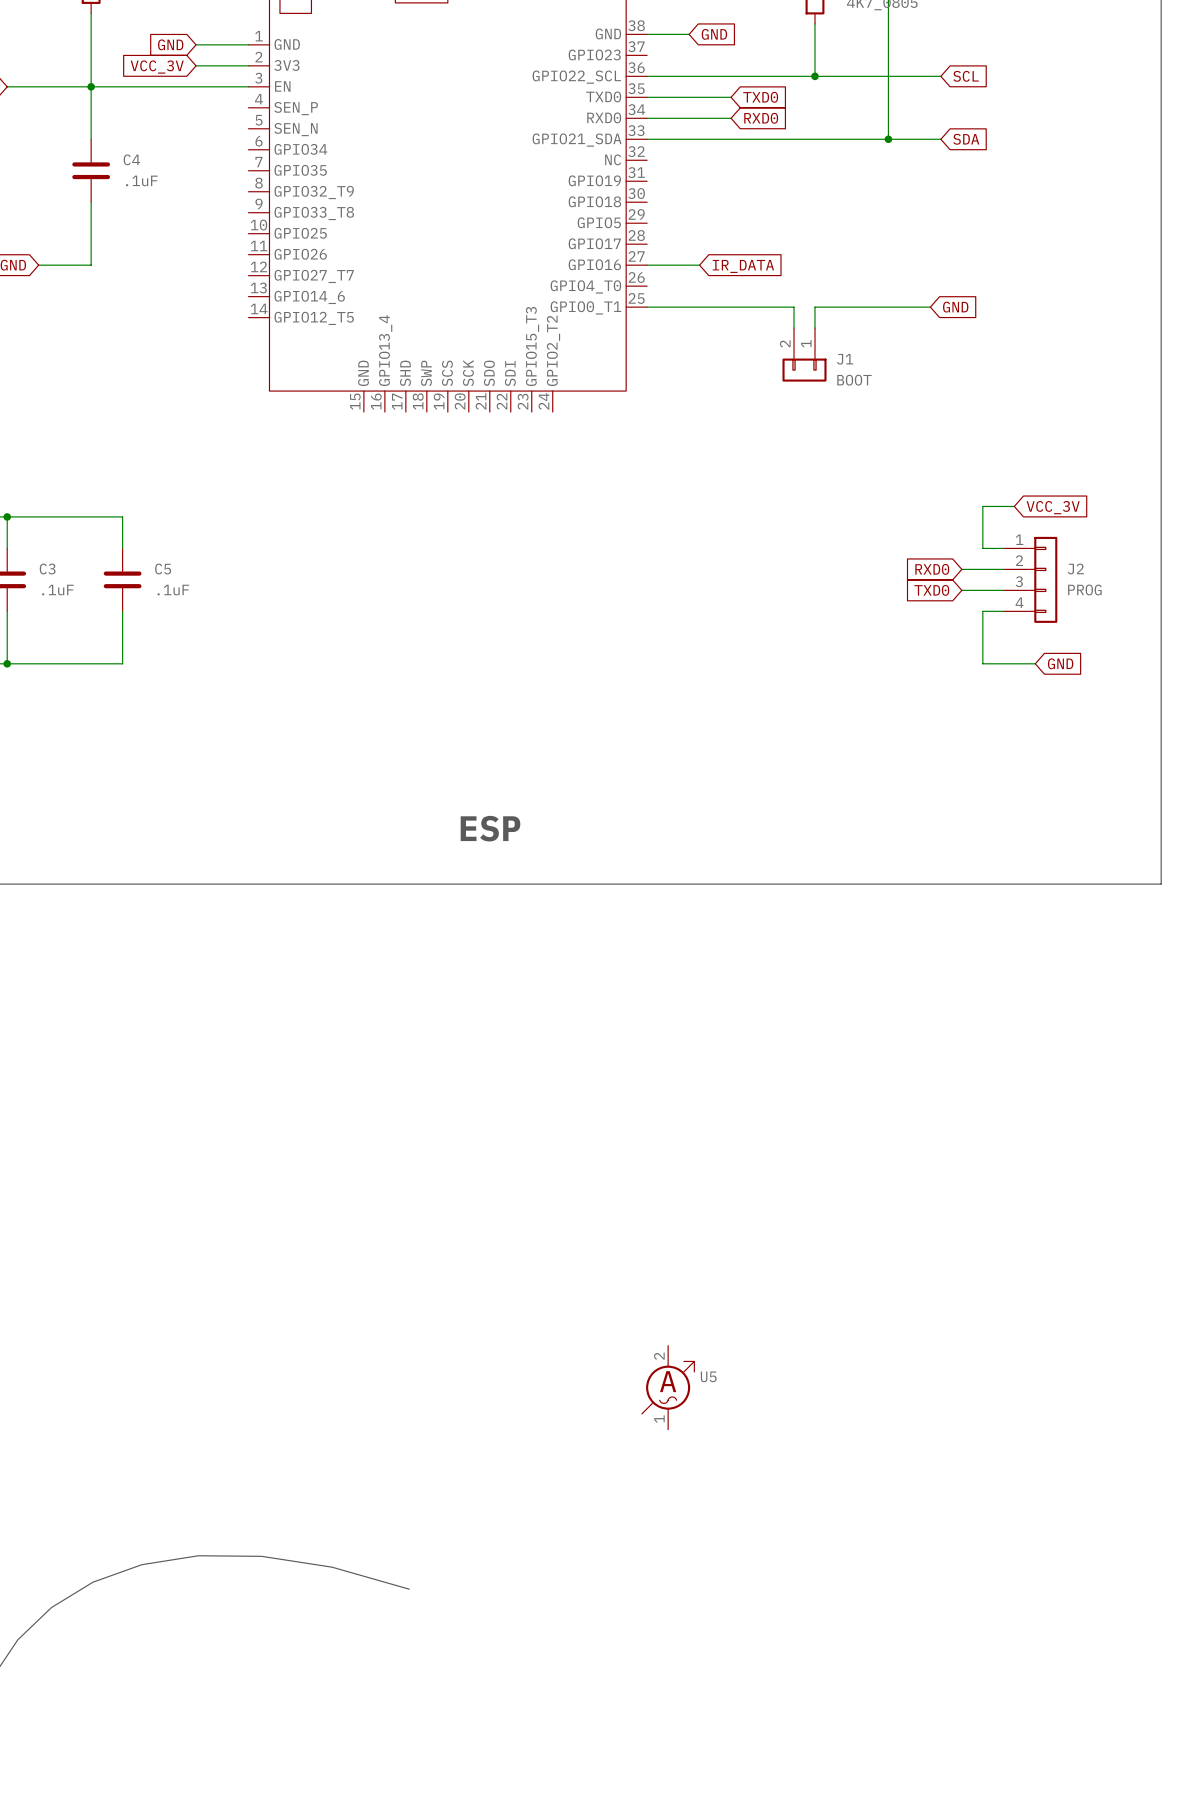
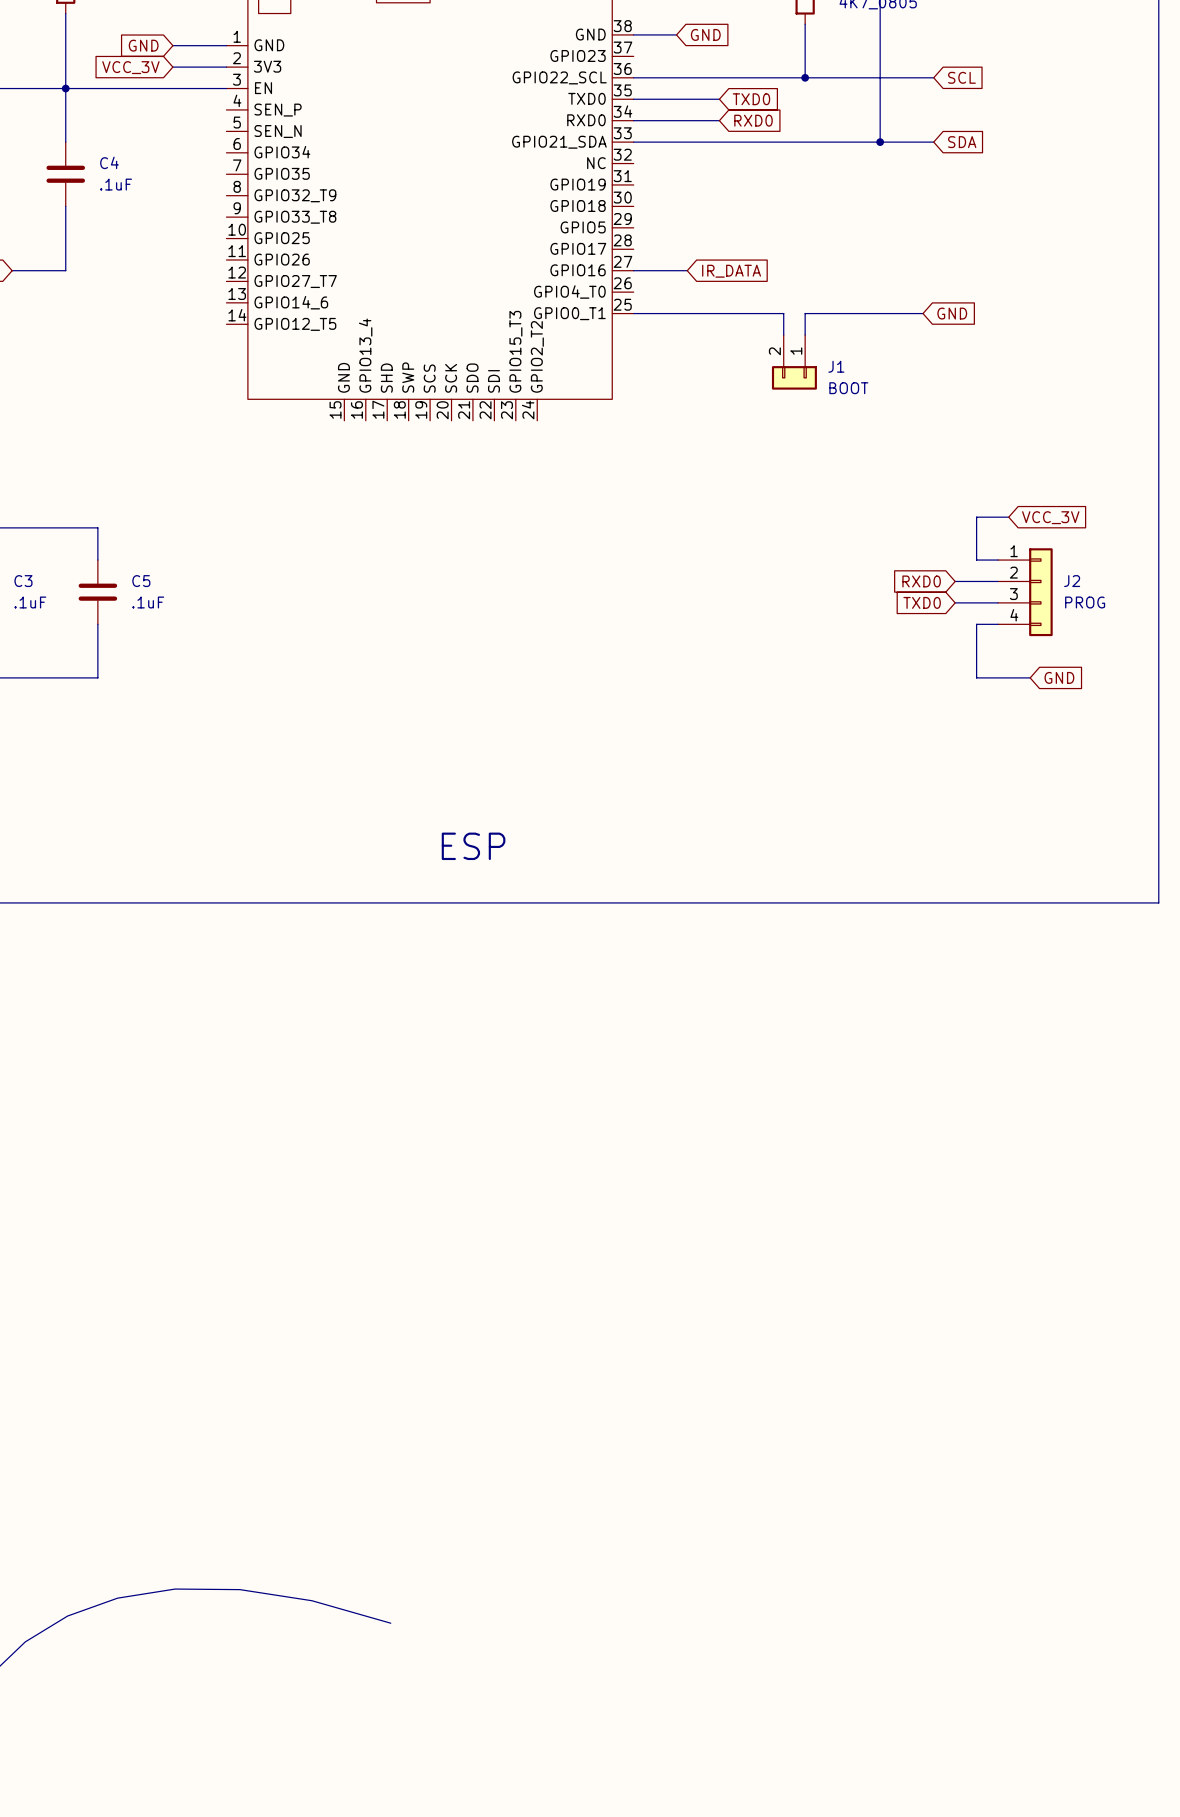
U5: (668, 1387) -> none

